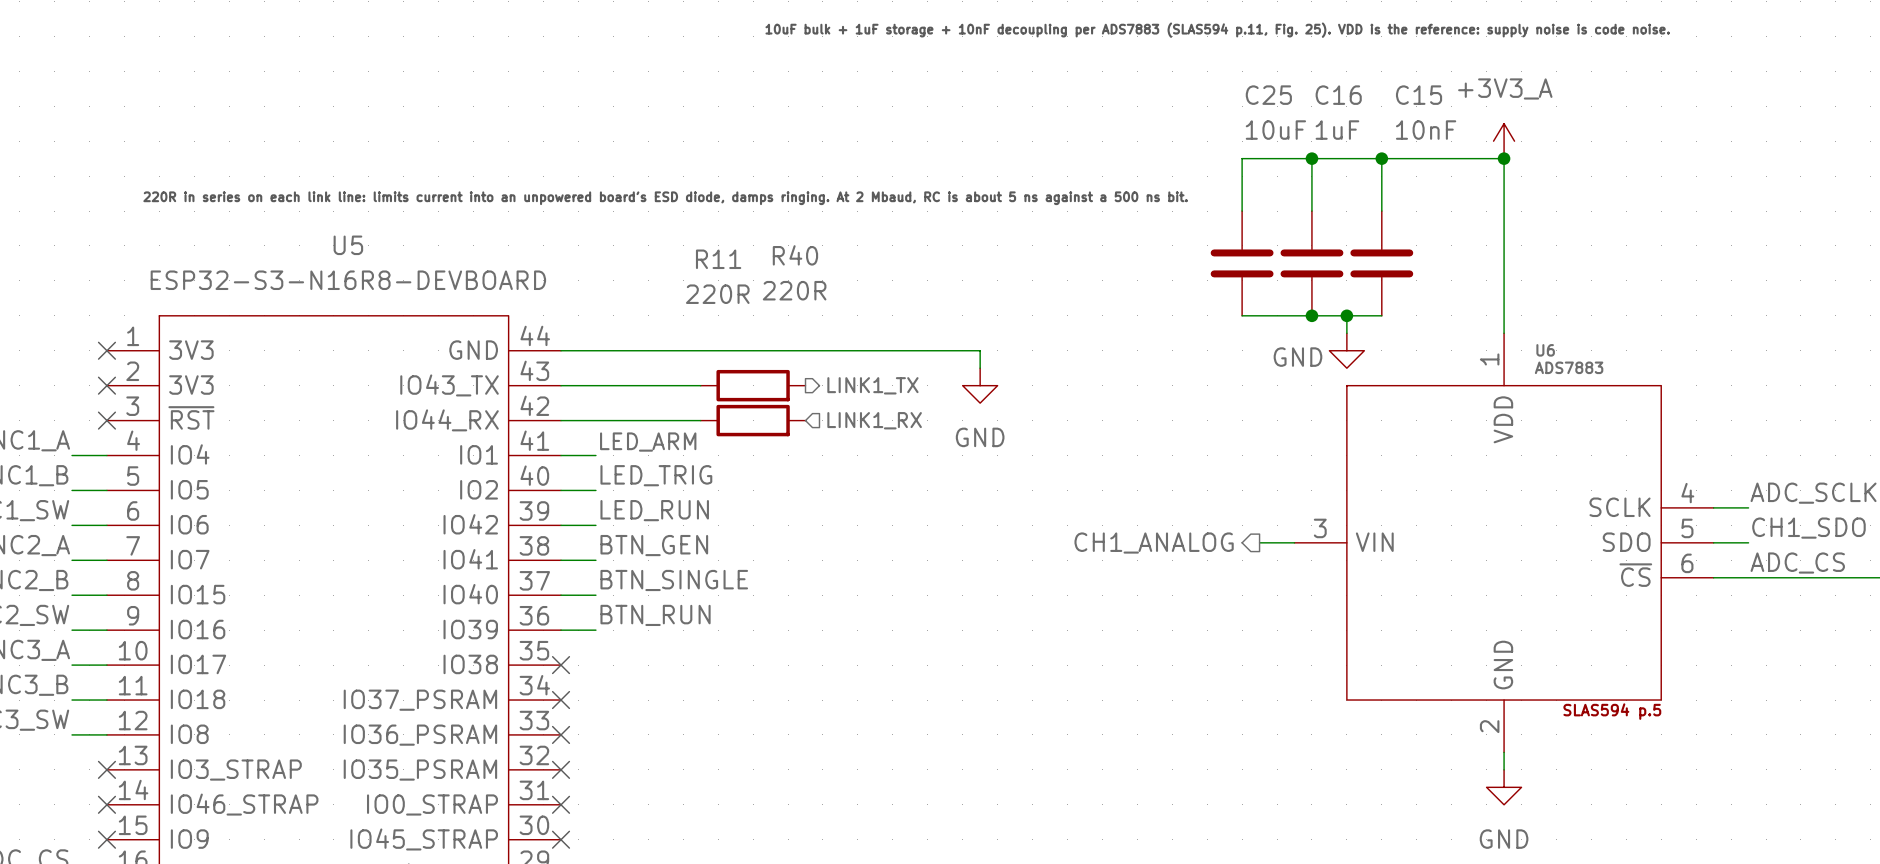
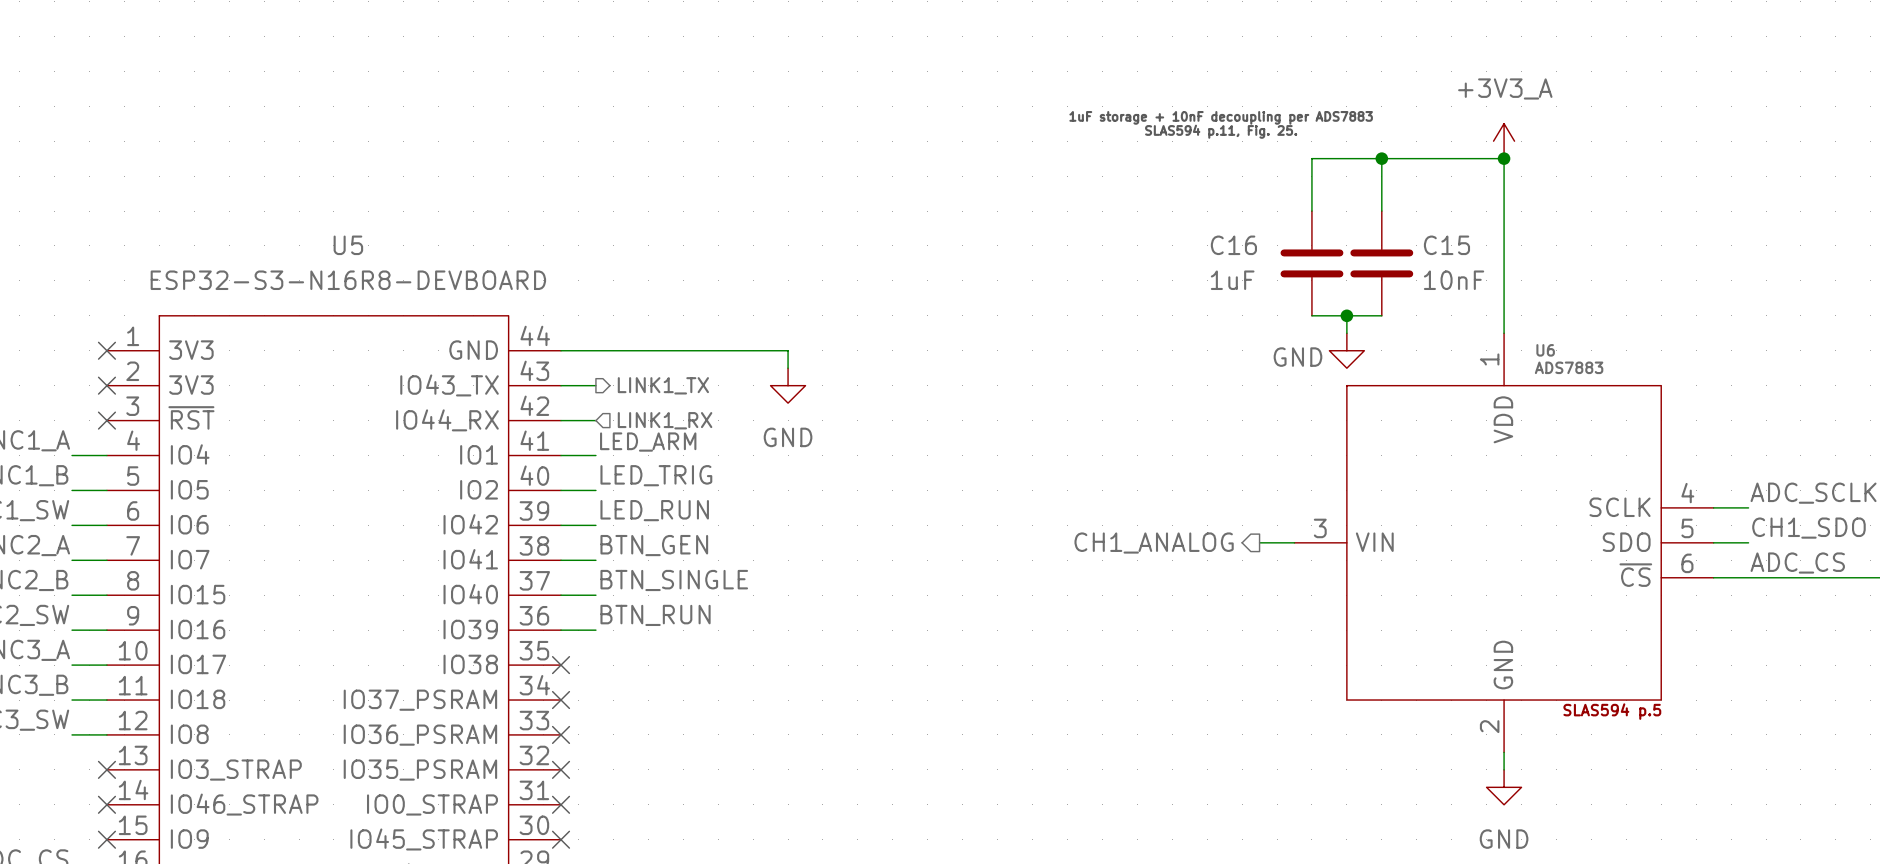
text: 10uF bulk + 1uF storage + 10nF decoupling per ADS7883 (SLAS594 p.11, Fig. 25). VDD is the reference: supply noise is code noise. (1217, 30) -> none
C16 name position: C16 (1338, 95) -> C16 (1233, 245)
C15 name position: C15 (1419, 95) -> C15 (1446, 245)
text: none -> 1uF storage + 10nF decoupling per ADS7883 (1221, 117)
C16 value position: 1uF (1337, 130) -> 1uF (1232, 280)
C15 value position: 10nF (1426, 130) -> 10nF (1454, 280)
text: none -> SLAS594 p.11, Fig. 25. (1221, 131)
wire: (1311, 158) (1242, 158) (1242, 211) -> none
junction: (1311, 158) -> none
text: 220R in series on each link line: limits current into an unpowered board's ESD diode, damps ringing. At 2 Mbaud, RC is about 5 ns against a 500 ns bit. (665, 198) -> none
C25: 10uF (1242, 263) -> none
wire: (1242, 315) (1311, 315) -> none
junction: (1311, 315) -> none
wire: (788, 350) (980, 350) (980, 368) -> (788, 350) (788, 368)
wire: (595, 385) (700, 385) -> none
R11: 220R (753, 385) -> none
hierarchical label position: LINK1_TX (872, 385) -> LINK1_TX (663, 385)
power symbol position: GND (980, 385) -> GND (788, 385)
wire: (595, 420) (700, 420) -> none
R40: 220R (753, 420) -> none
hierarchical label position: LINK1_RX (874, 420) -> LINK1_RX (665, 420)

